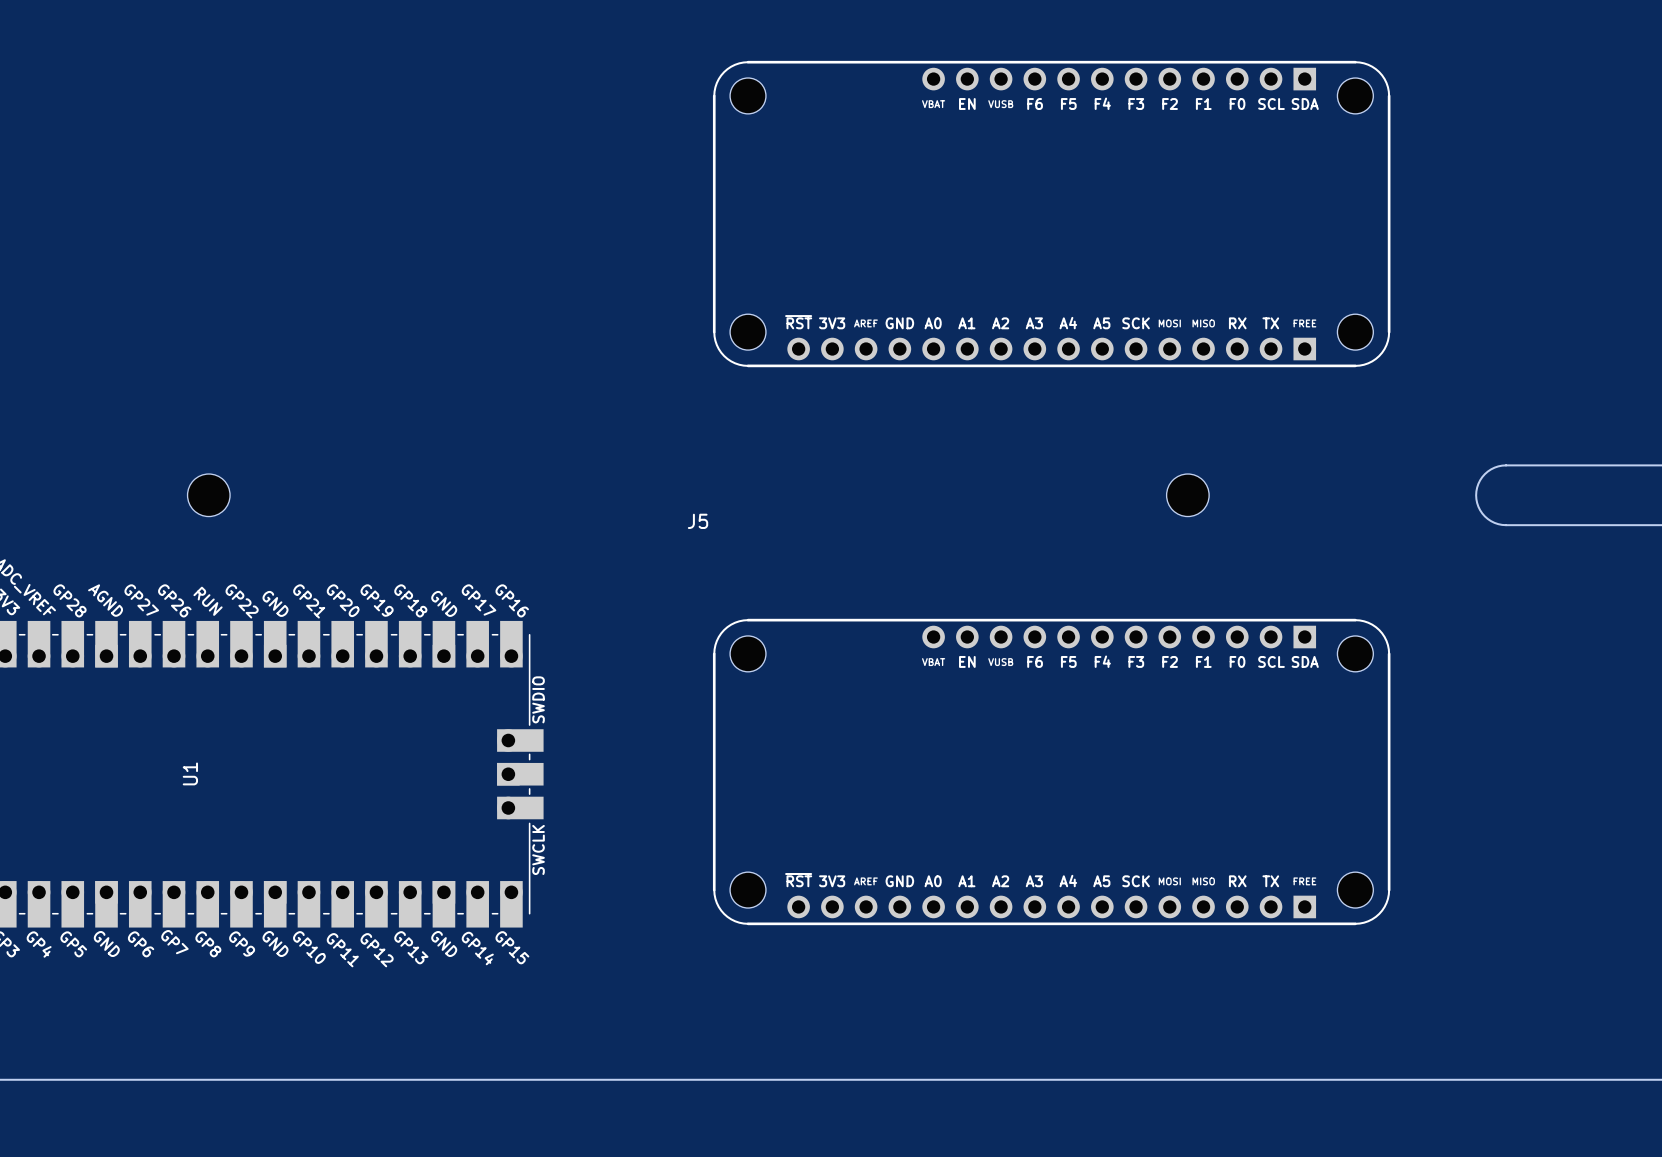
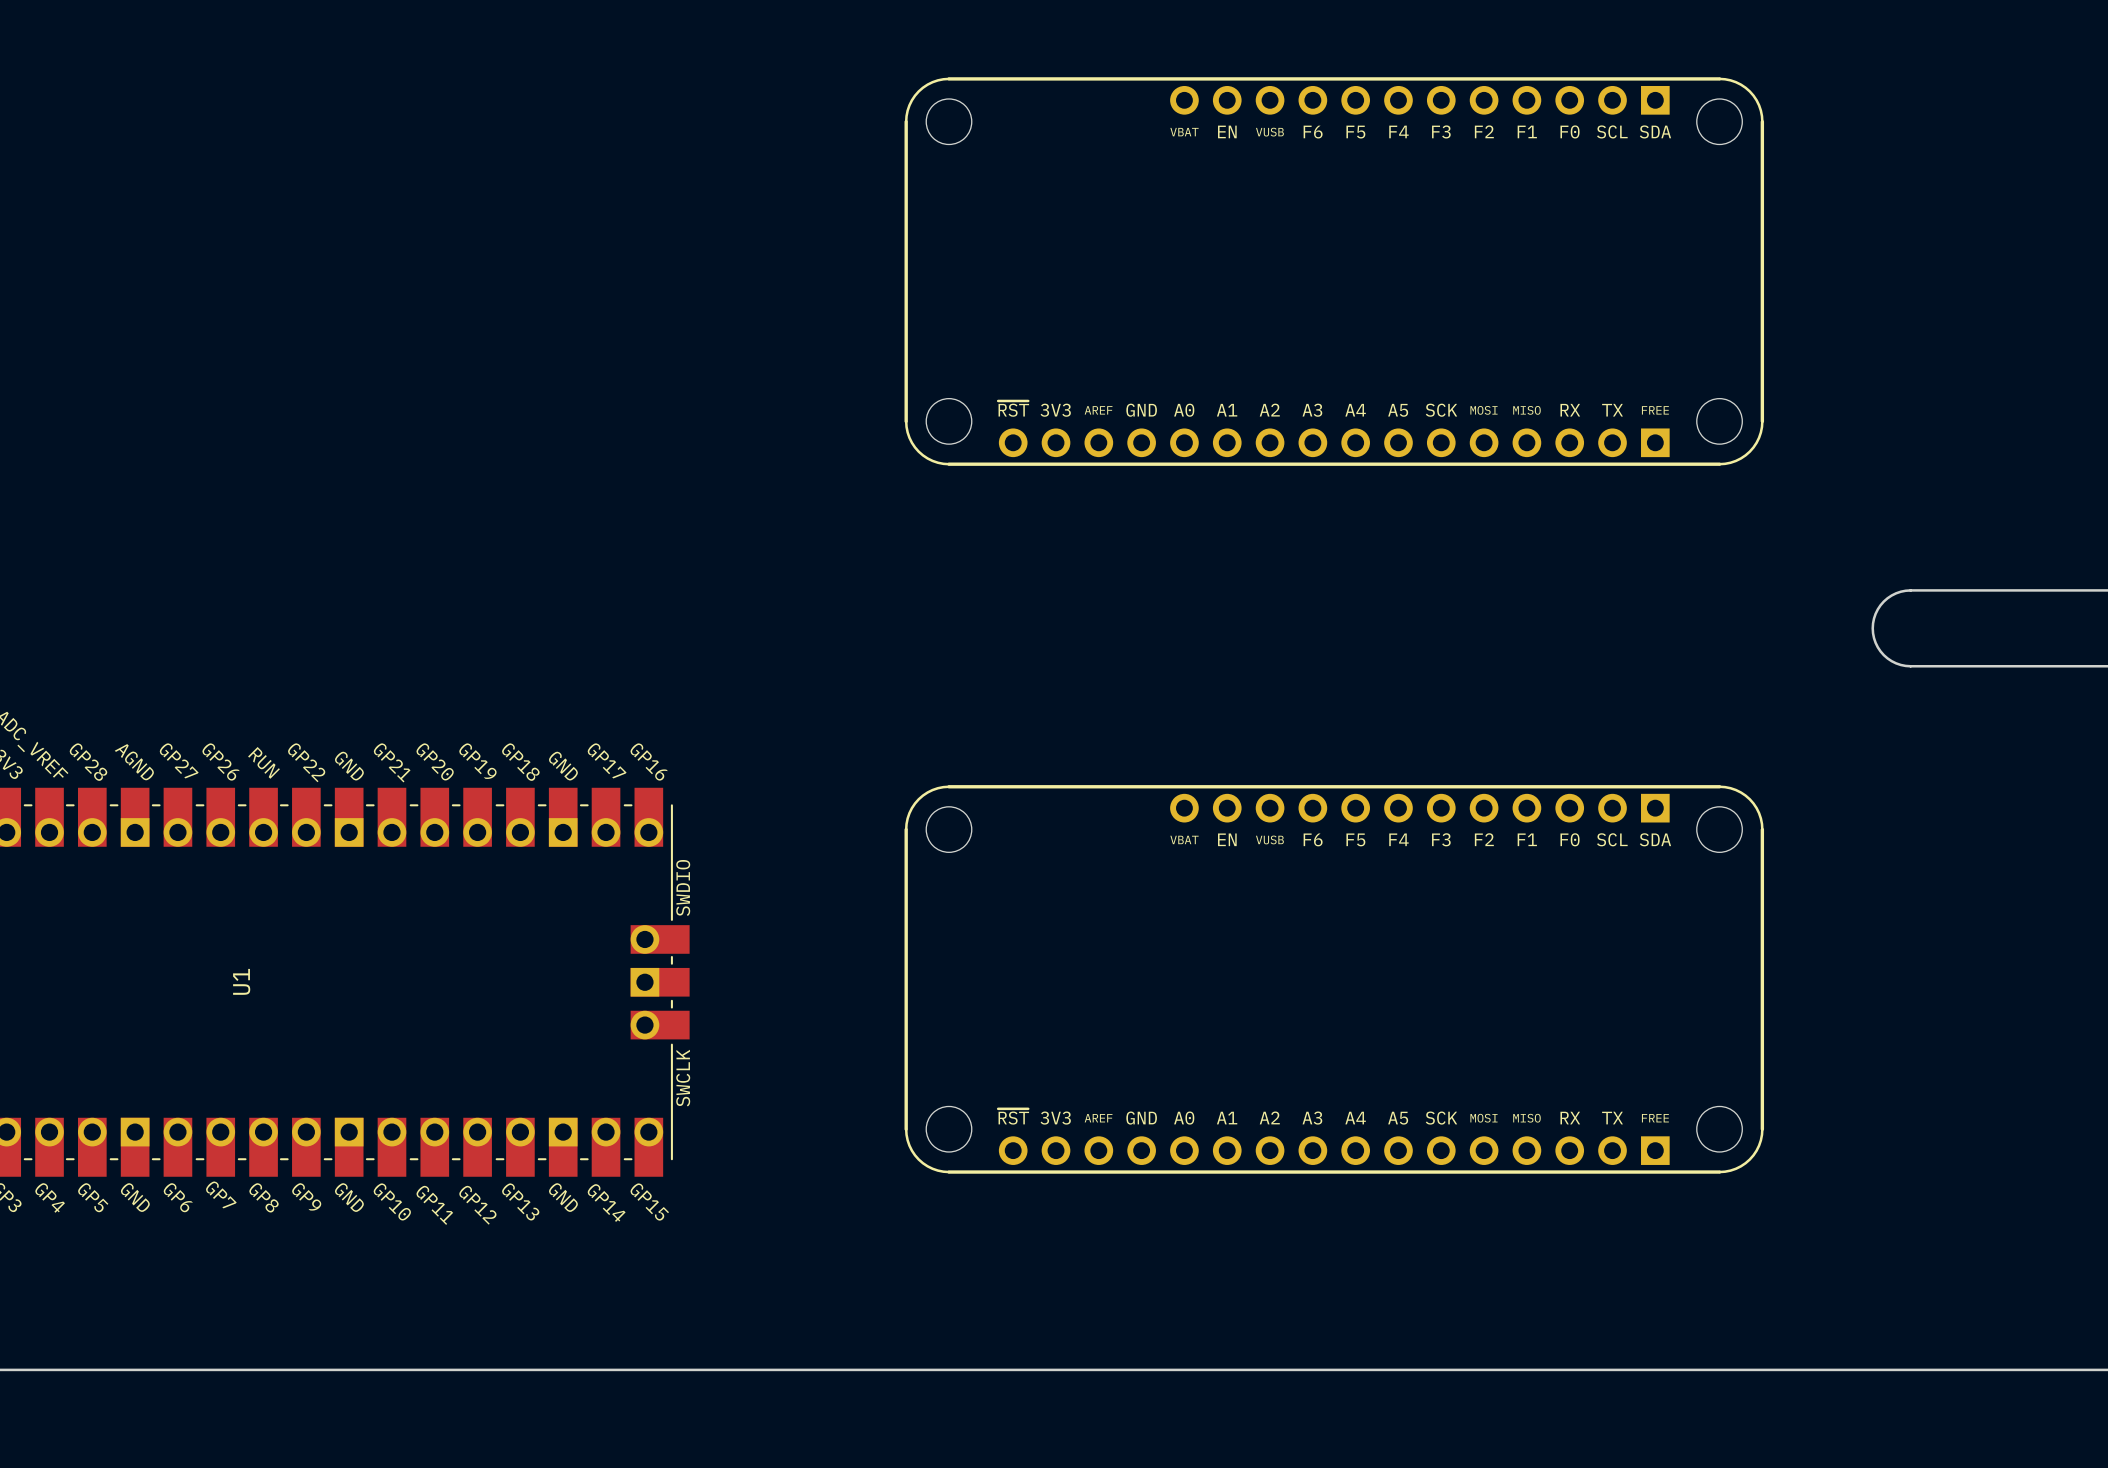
J5: (698, 495) -> none

